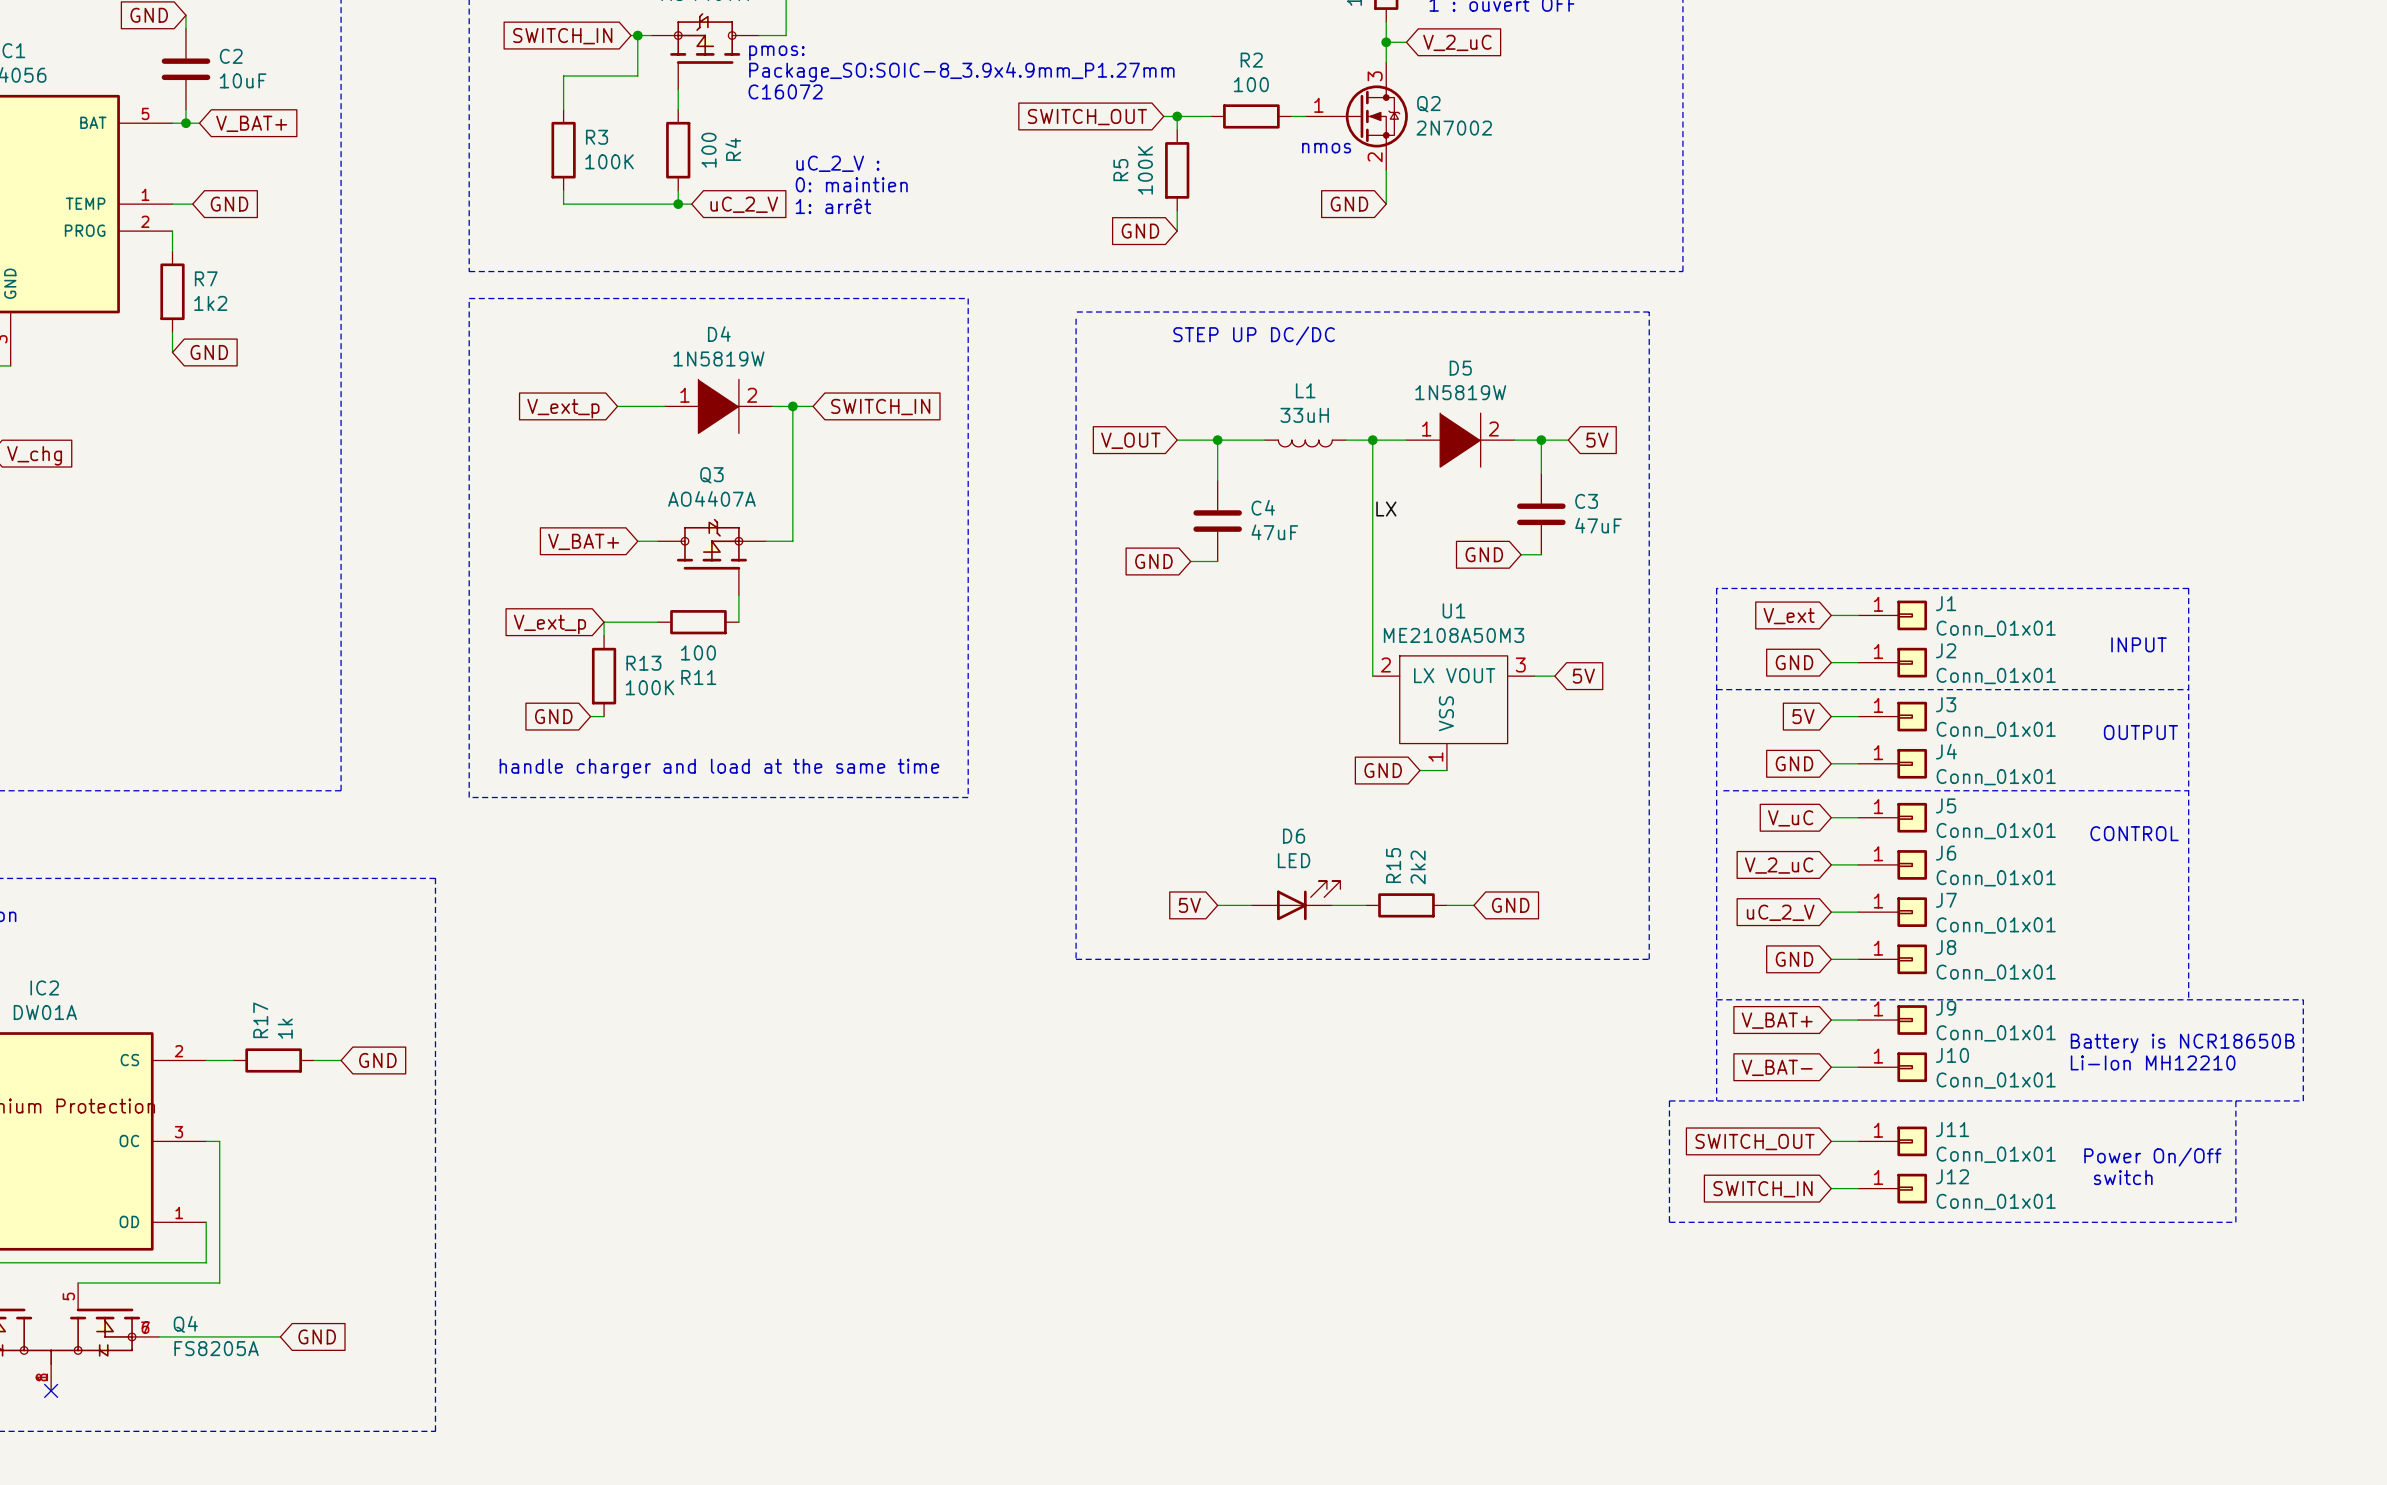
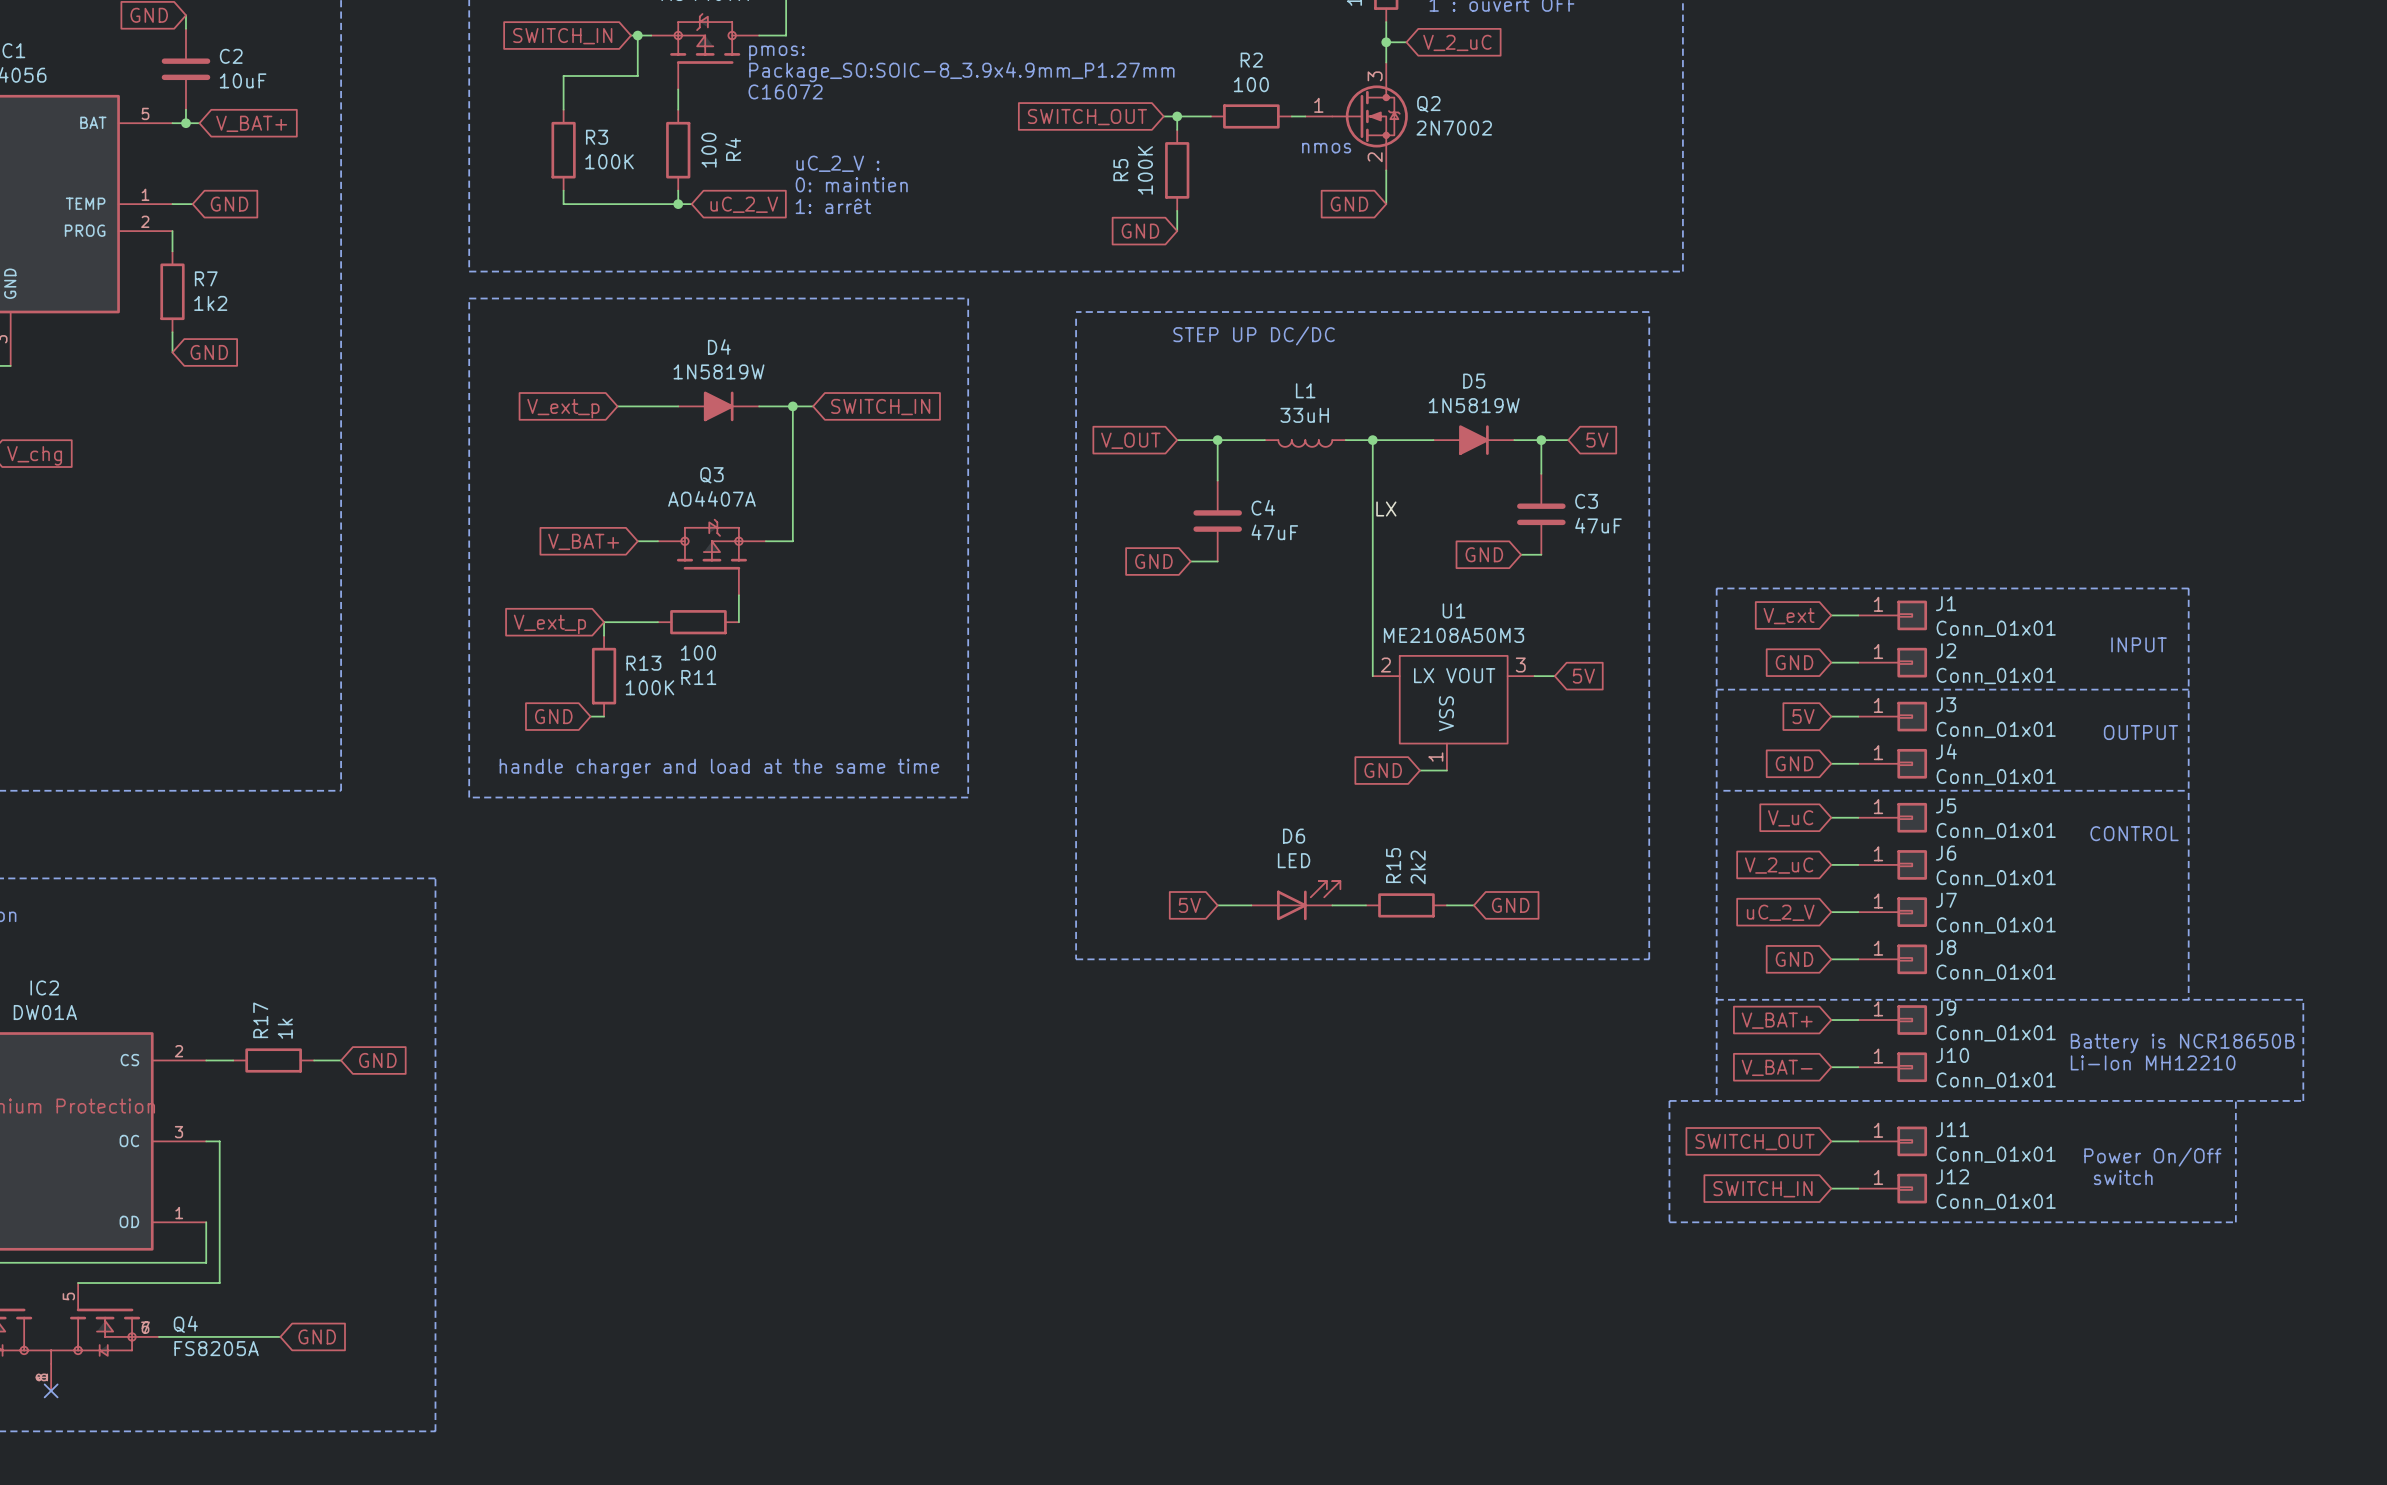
D4 symbol: [664, 379, 773, 434] -> [678, 391, 760, 422]
D5 symbol: [1406, 413, 1515, 468] -> [1433, 425, 1515, 455]

